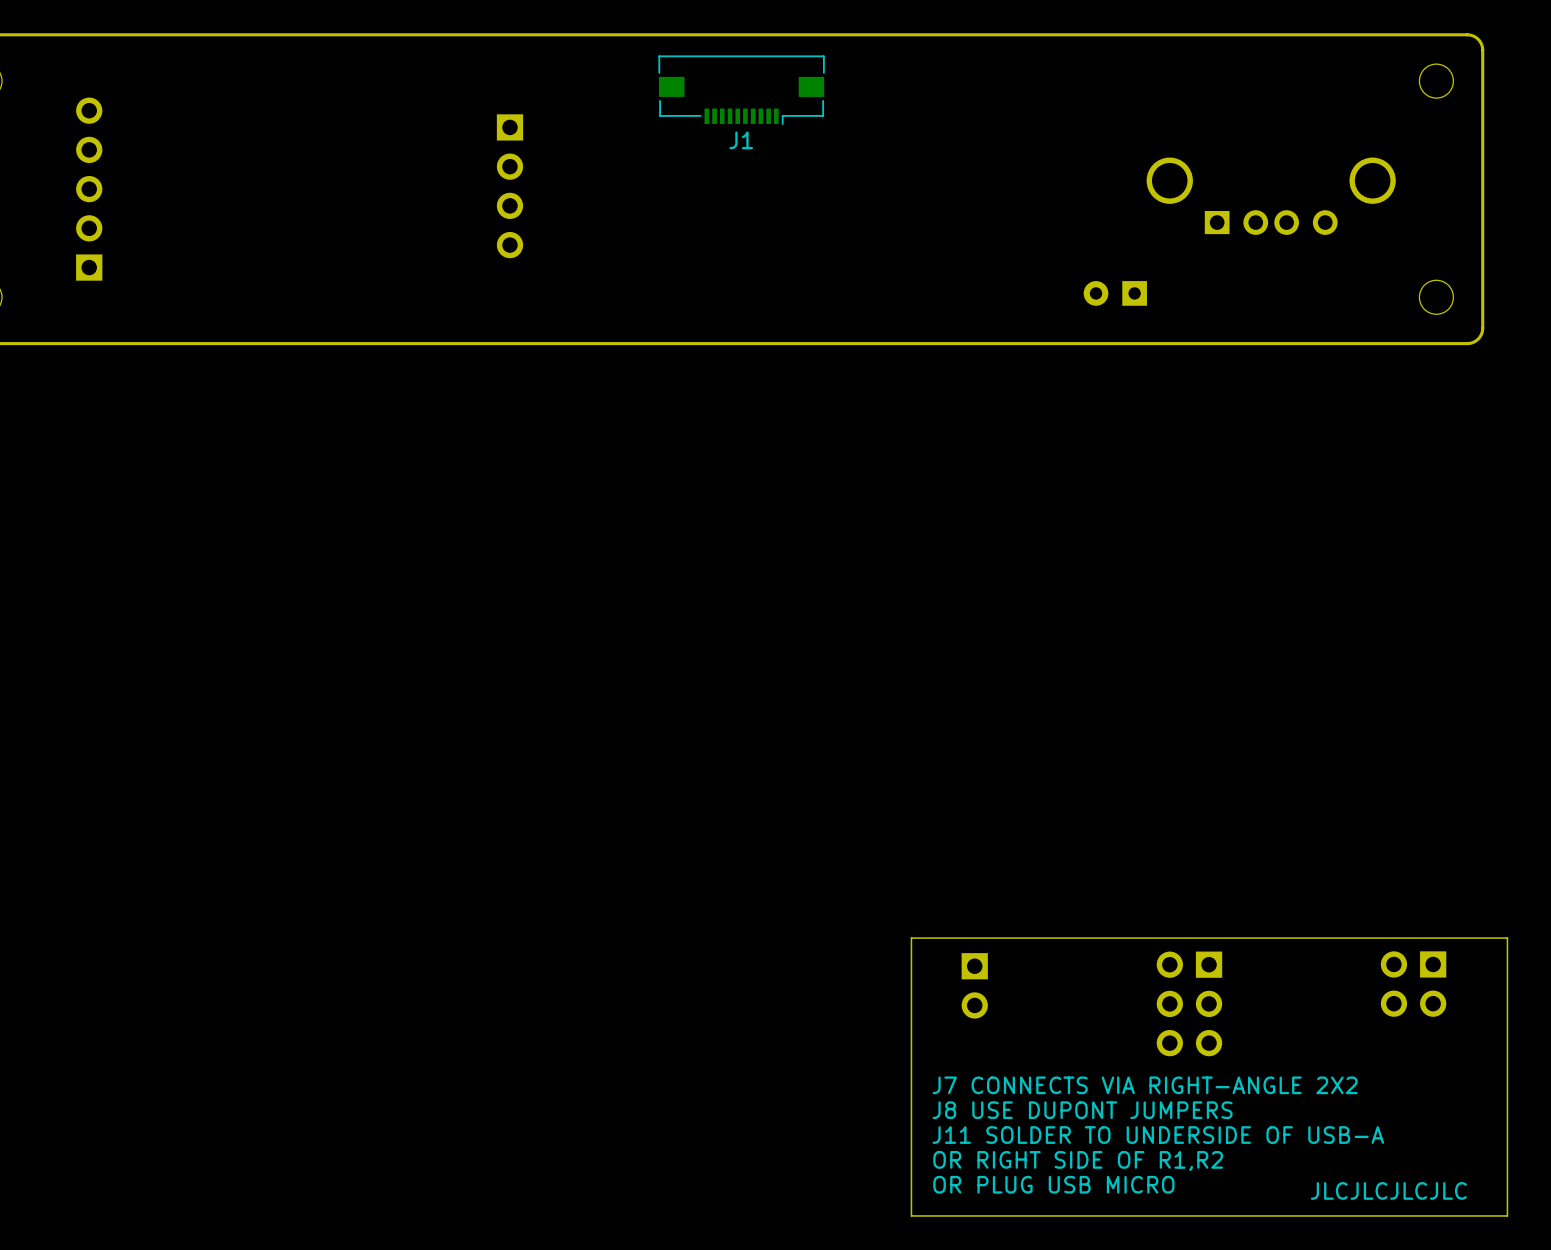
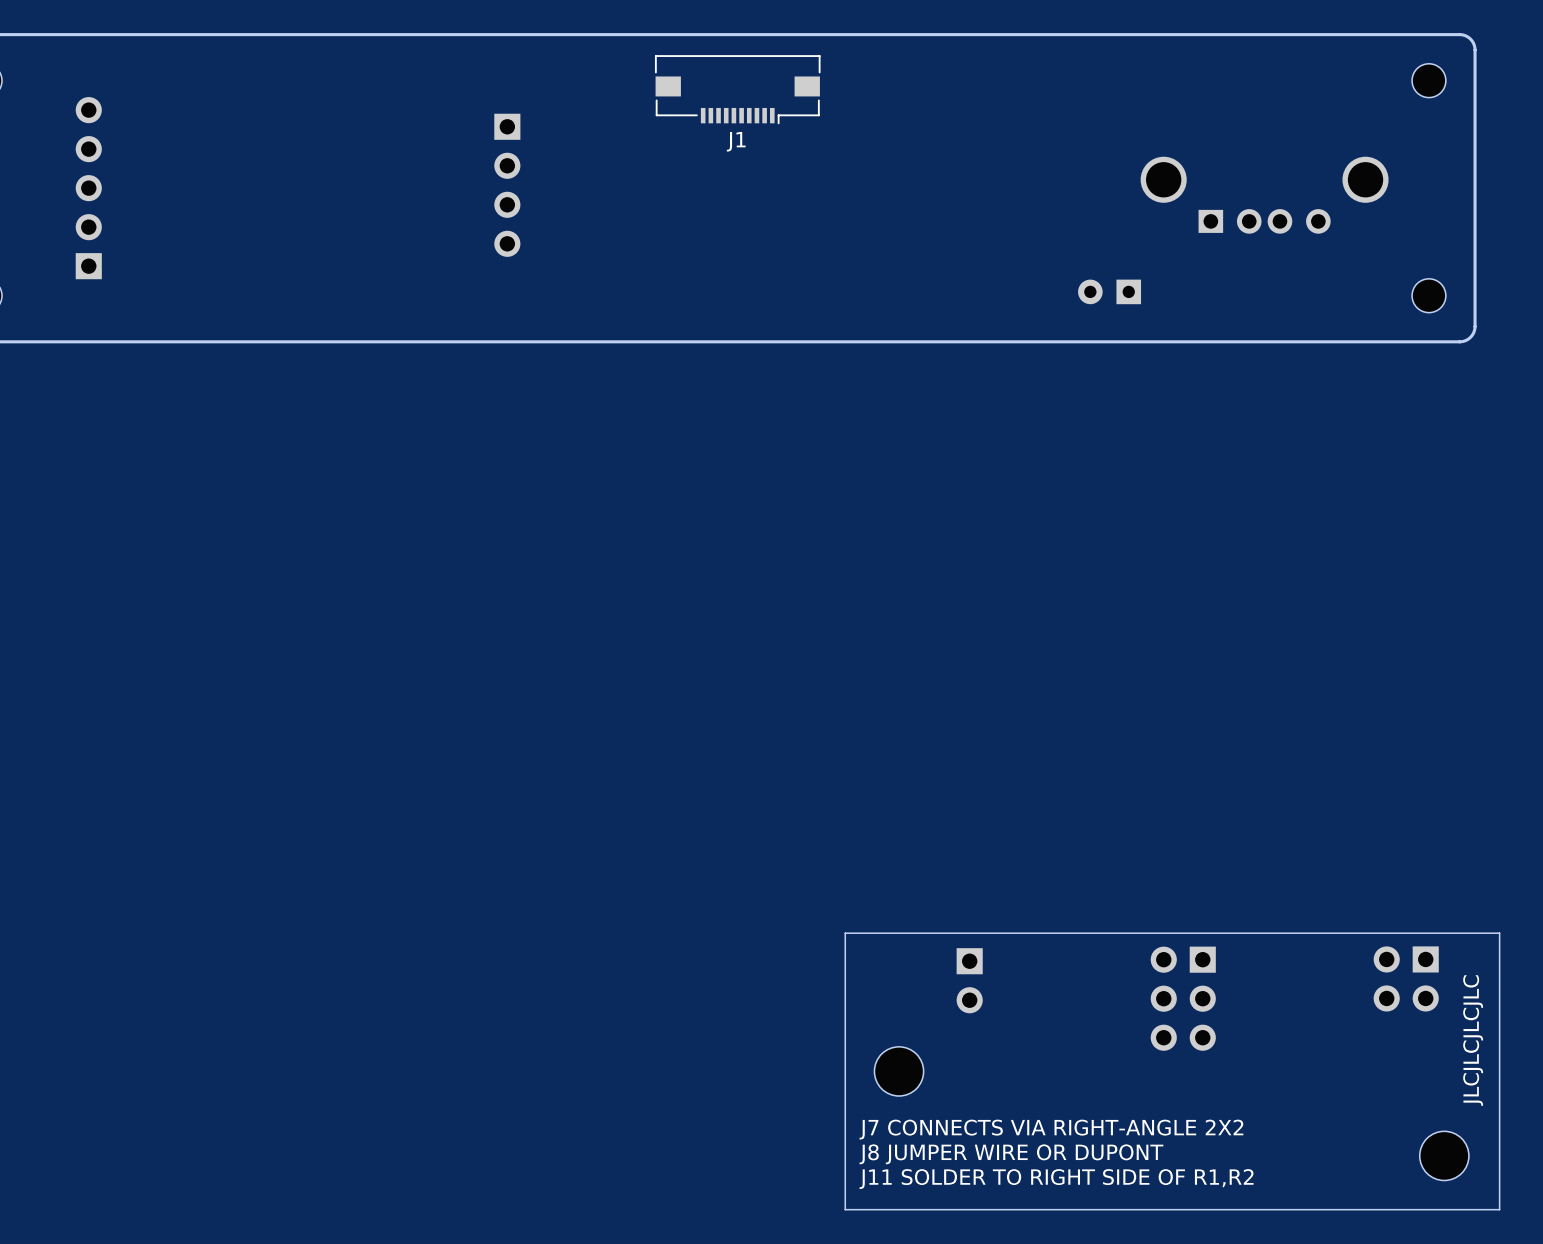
board edge: (911, 938) (911, 1215) -> (906, 933) (845, 933) (845, 1209) (906, 1209)
part: none -> (899, 1071)
text position: J7 CONNECTS VIA RIGHT-ANGLE 2X2 (1145, 1085) -> J7 CONNECTS VIA RIGHT-ANGLE 2X2 (1051, 1129)
text: J8 USE DUPONT JUMPERS (1082, 1110) -> none
text: J11 SOLDER TO UNDERSIDE OF USB-A (1158, 1135) -> none
text: none -> J8 JUMPER WIRE OR DUPONT (1011, 1154)
text: OR RIGHT SIDE OF R1,R2 (1078, 1160) -> J11 SOLDER TO RIGHT SIDE OF R1,R2 (1056, 1179)
part: none -> (1444, 1155)
text: OR PLUG USB MICRO (1053, 1184) -> none
text rotation: 0° (1388, 1190) -> 90° counterclockwise (1473, 1040)
text position: JLCJLCJLCJLC (1388, 1190) -> JLCJLCJLCJLC (1473, 1040)

